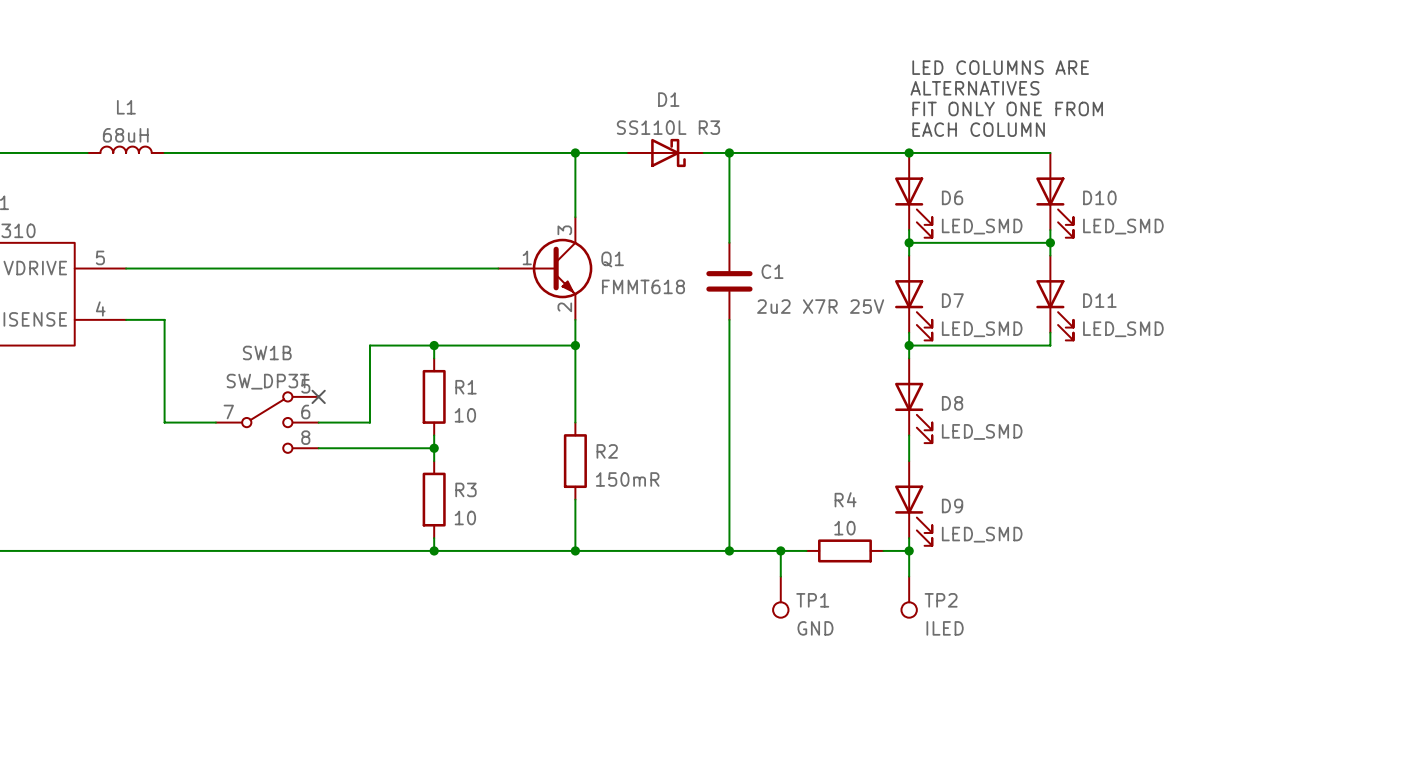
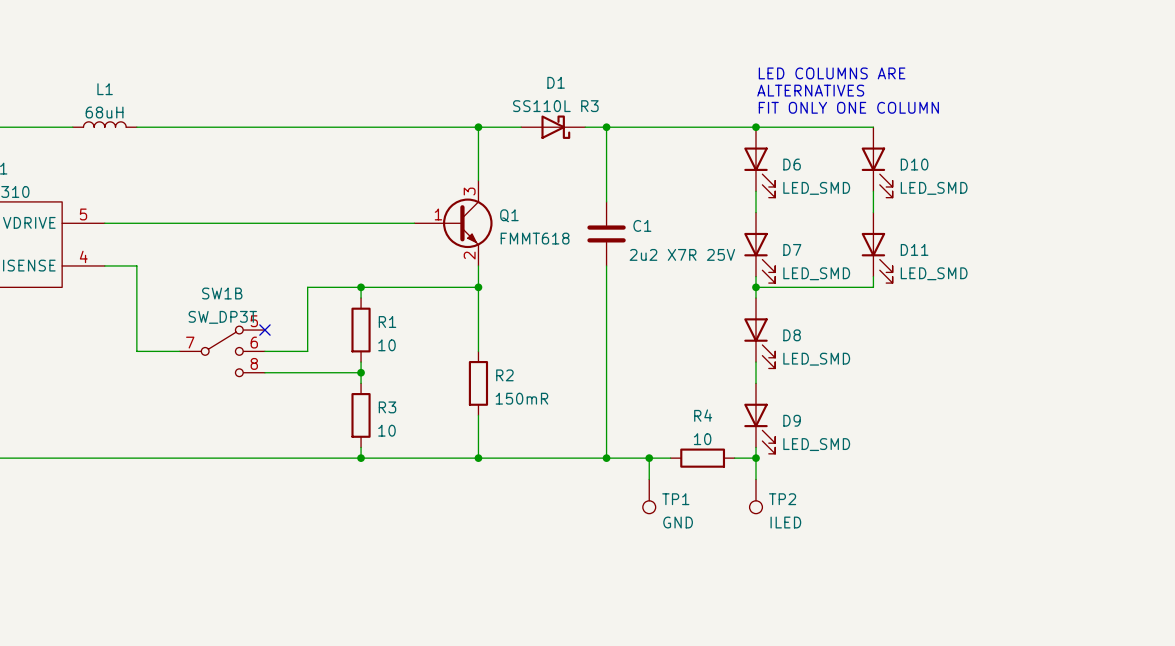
text: LED COLUMNS ARE (1000, 67) -> none
text: ALTERNATIVES (974, 88) -> LED COLUMNS ARE (832, 73)
text: FIT ONLY ONE FROM (1007, 108) -> ALTERNATIVES (810, 90)
text: EACH COLUMN (978, 129) -> FIT ONLY ONE COLUMN (848, 107)
wire: (909, 242) (1050, 242) -> none
junction: (909, 242) -> none
junction: (1050, 242) -> none

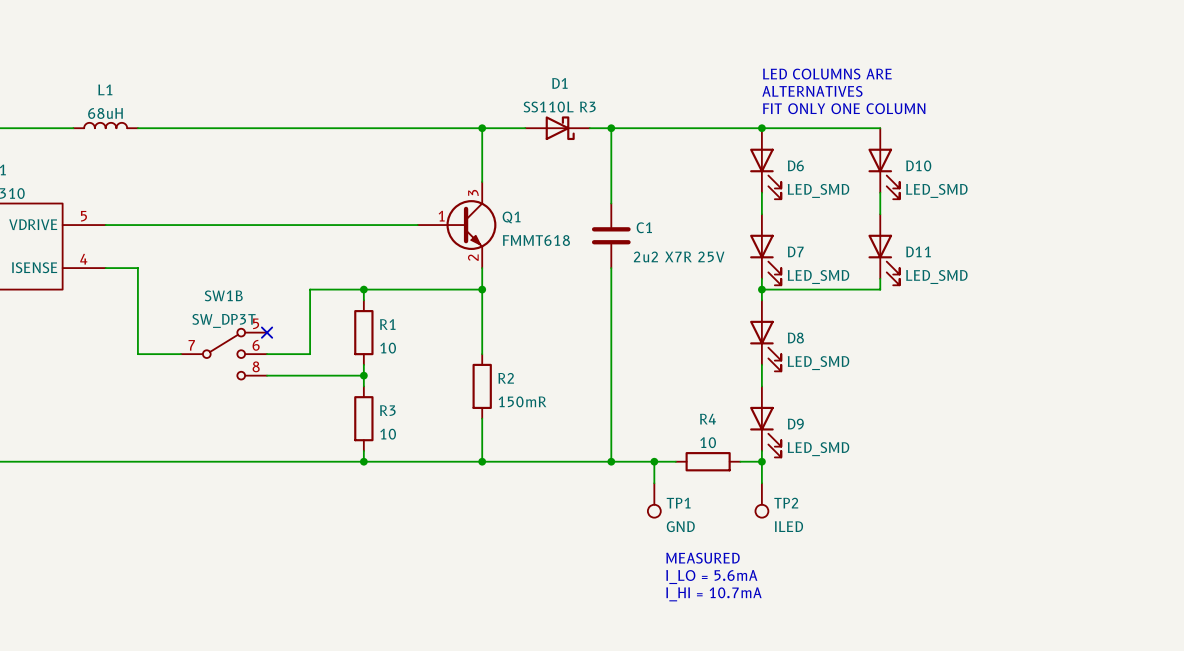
text: none -> MEASURED (703, 558)
text: none -> I_LO = 5.6mA (711, 577)
text: none -> I_HI = 10.7mA (713, 594)

